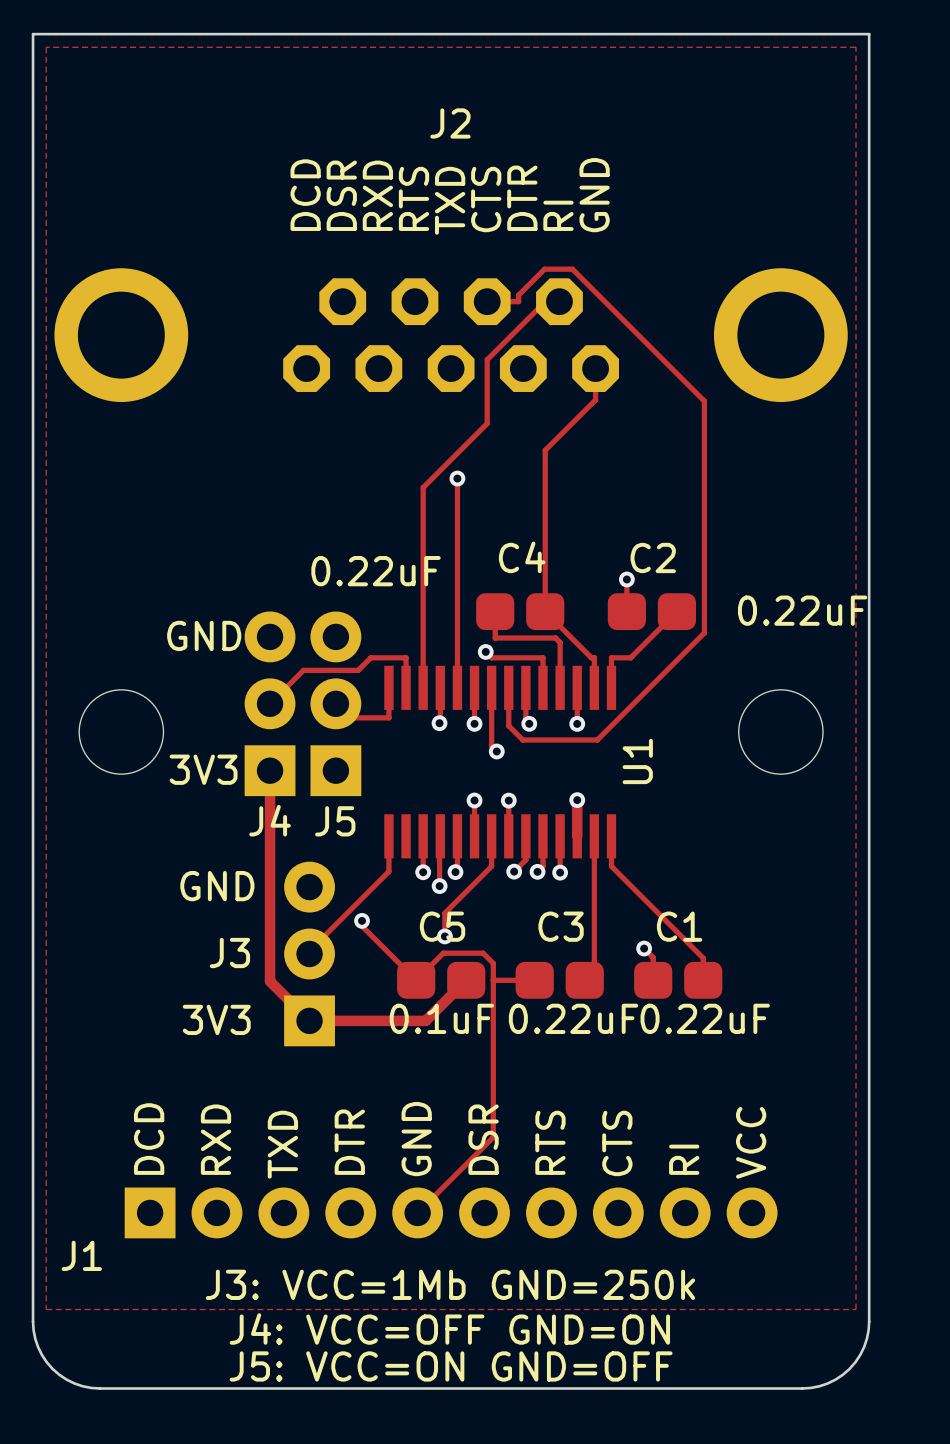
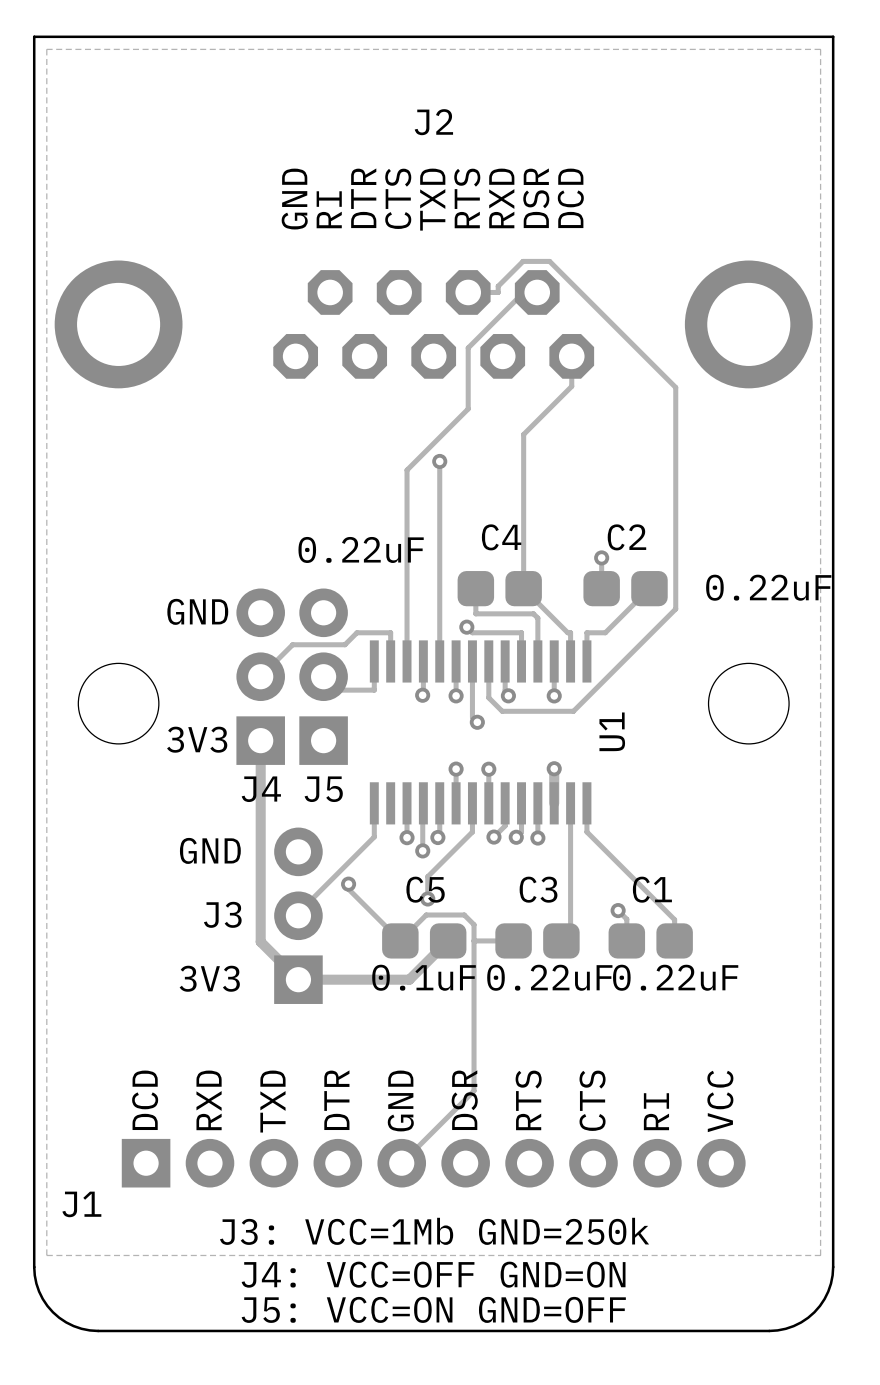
text: DCD (305, 195) -> GND (294, 199)
text: DSR (341, 195) -> RI (329, 209)
text: RXD (377, 195) -> DTR (363, 198)
text: GND (594, 195) -> DCD (570, 198)
text: RTS (413, 198) -> CTS (398, 198)
text: DTR (522, 198) -> RXD (501, 198)
text: CTS (486, 199) -> RTS (467, 198)
text: RI (558, 215) -> DSR (536, 198)

